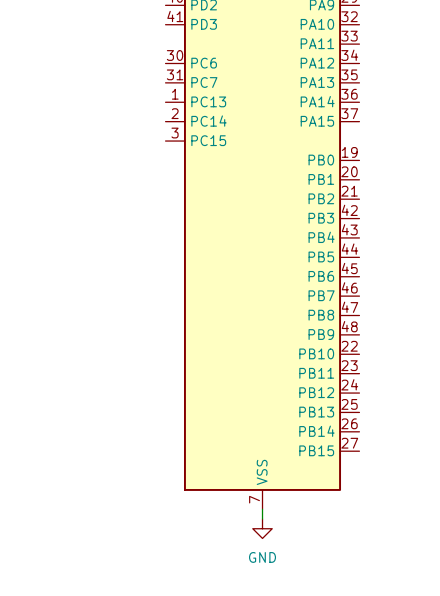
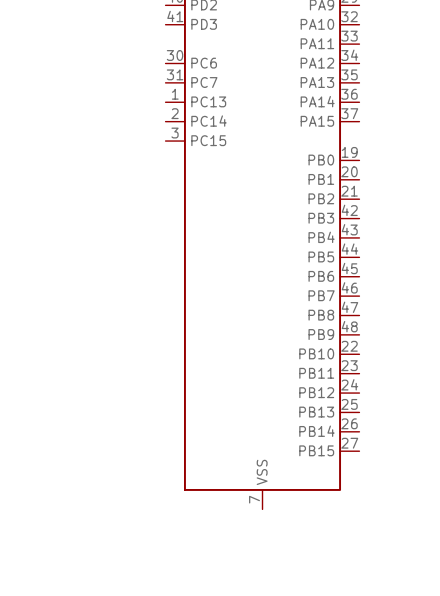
wire: (262, 509) (262, 519) -> none
power symbol: GND (262, 528) -> none

